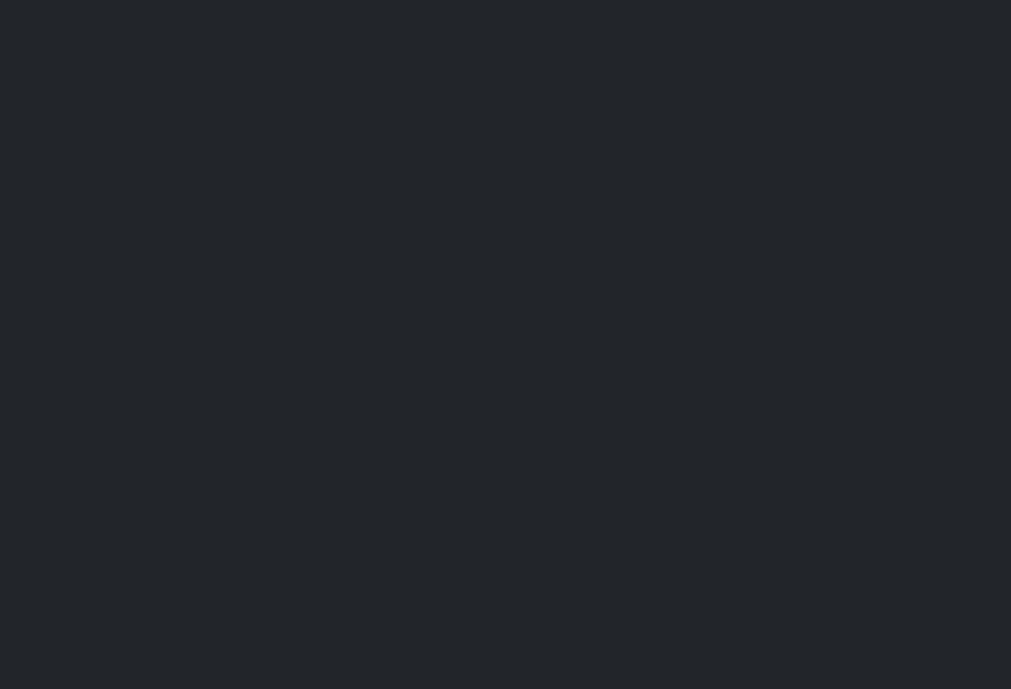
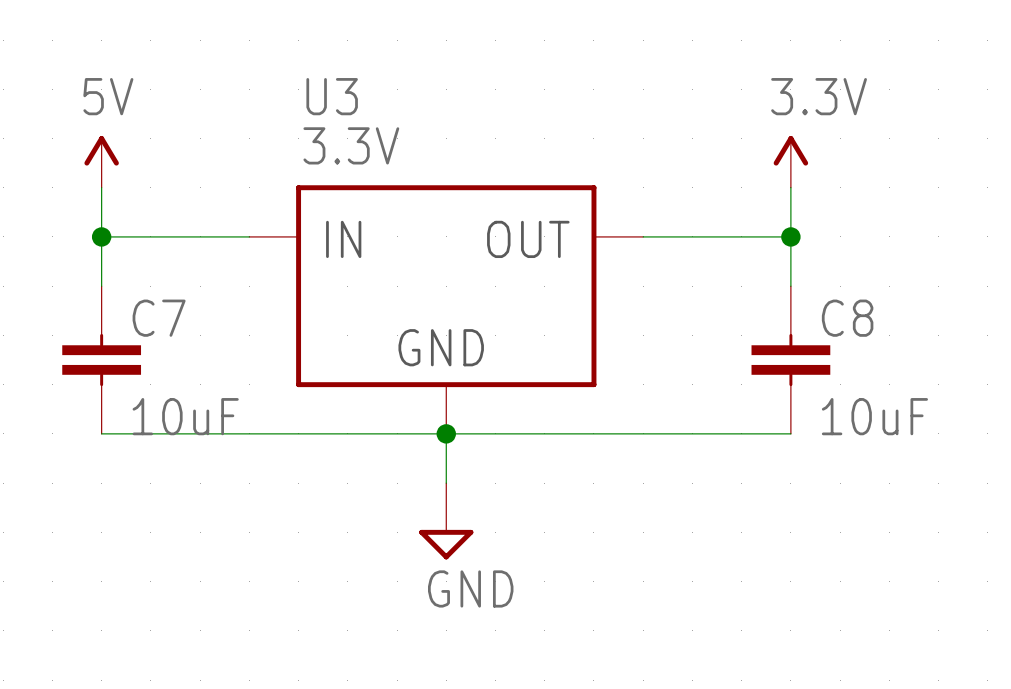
power symbol: none -> 5V (101, 161)
power symbol: none -> 3.3V (790, 161)
wire: none -> (101, 187) (101, 286)
wire: none -> (790, 187) (790, 286)
wire: none -> (101, 236) (249, 236)
junction: none -> (101, 236)
wire: none -> (643, 236) (790, 236)
junction: none -> (790, 236)
U3: none -> 3.3V (446, 309)
C7: none -> 10uF (101, 360)
C8: none -> 10uF (790, 360)
wire: none -> (101, 433) (790, 433)
wire: none -> (446, 433) (446, 483)
junction: none -> (446, 433)
power symbol: none -> GND (446, 521)

